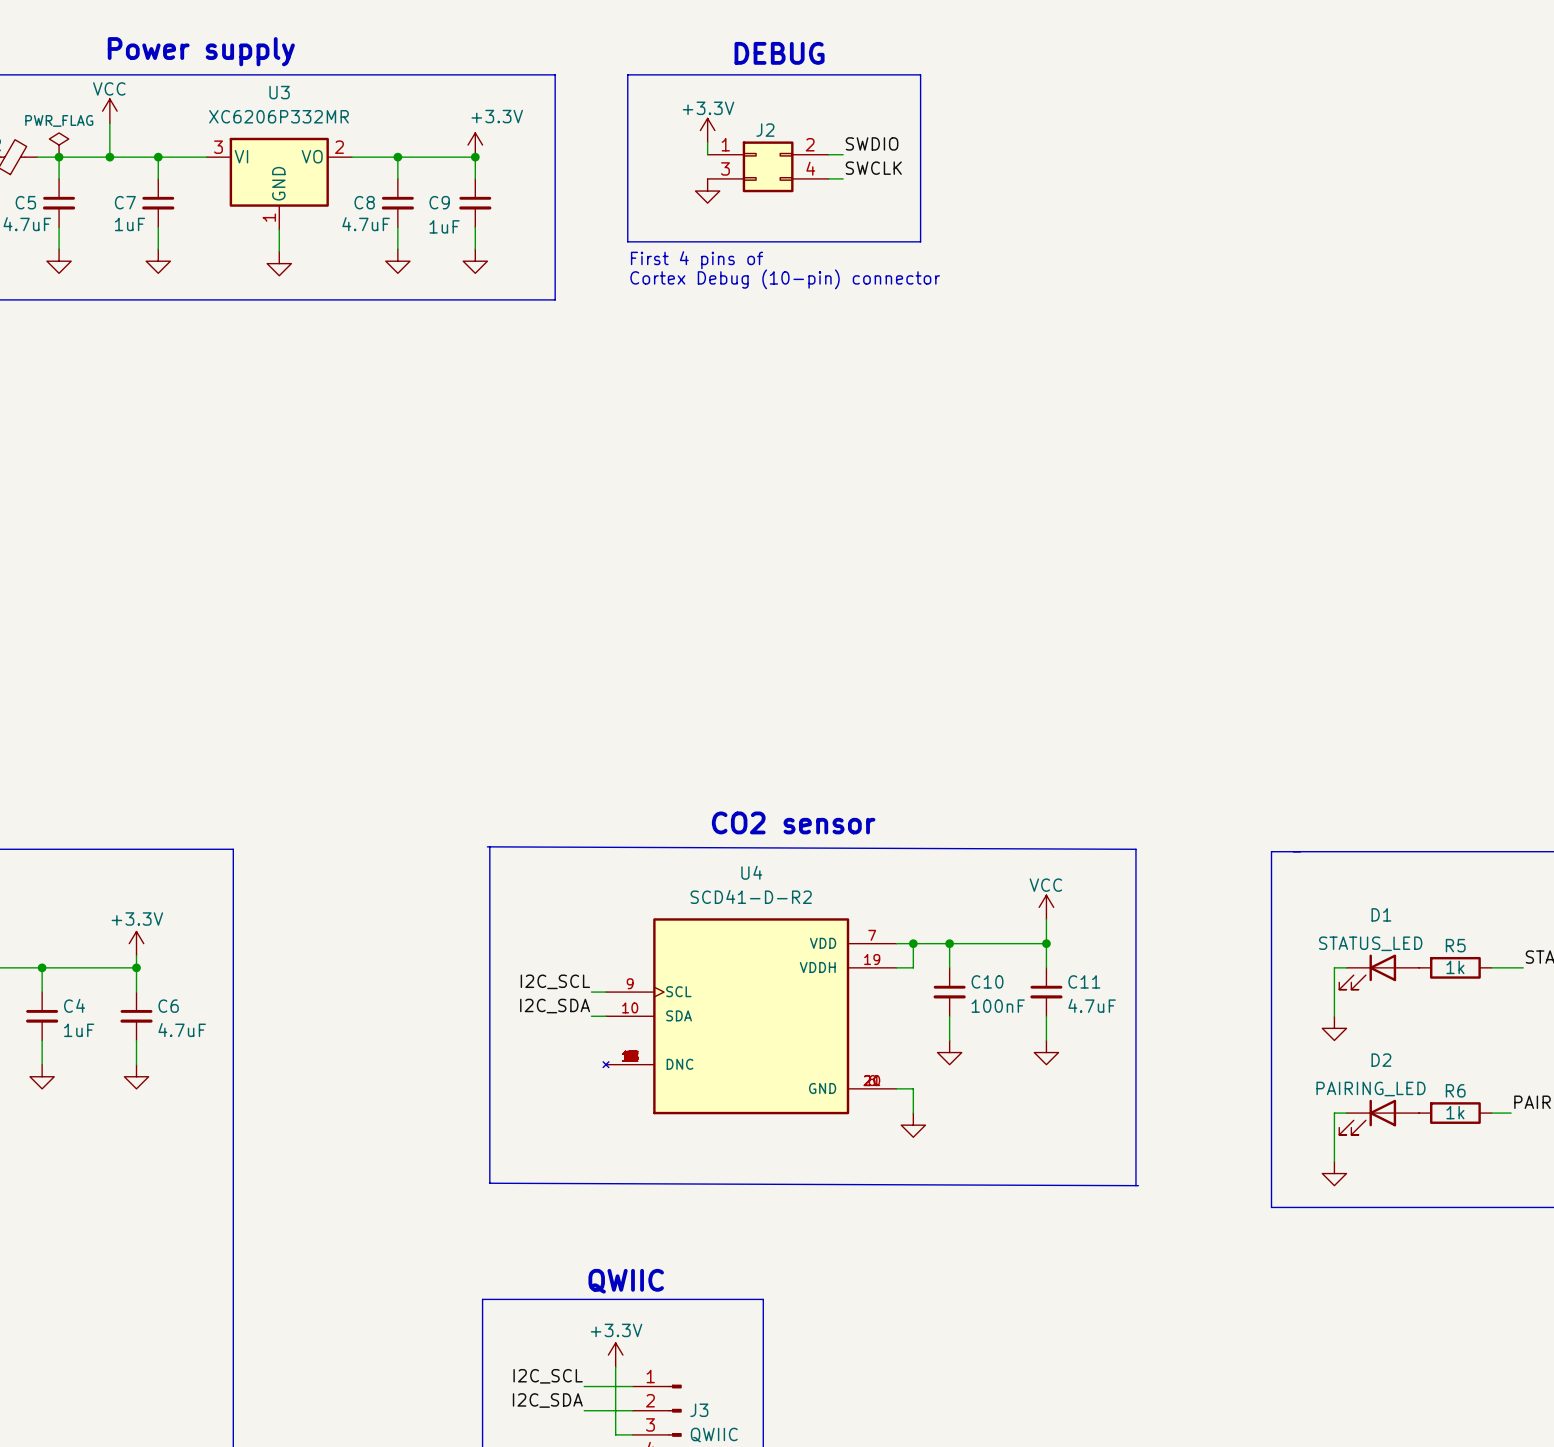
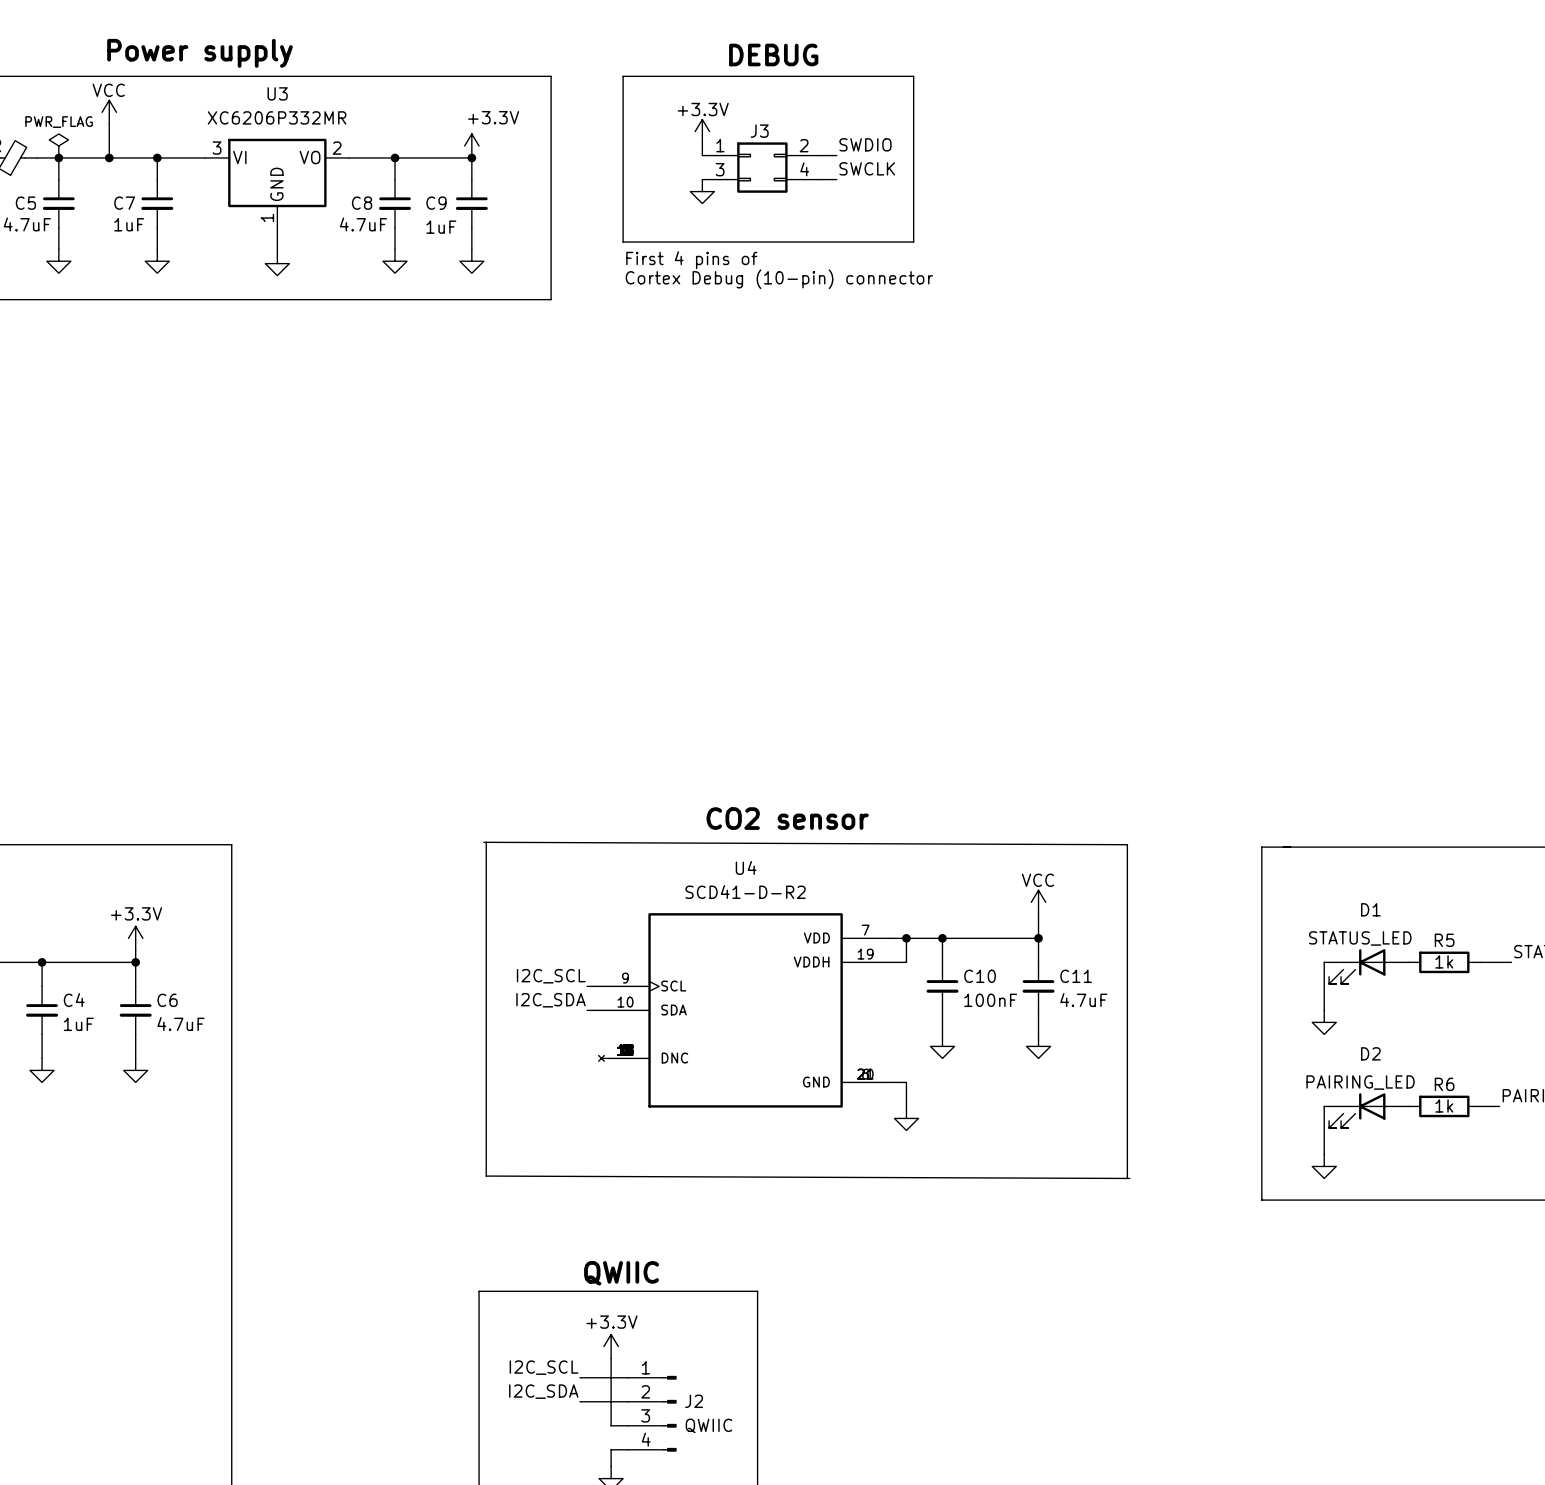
J2 name: J2 (765, 130) -> J3 (759, 131)
J3 name: J3 (699, 1410) -> J2 (694, 1401)

